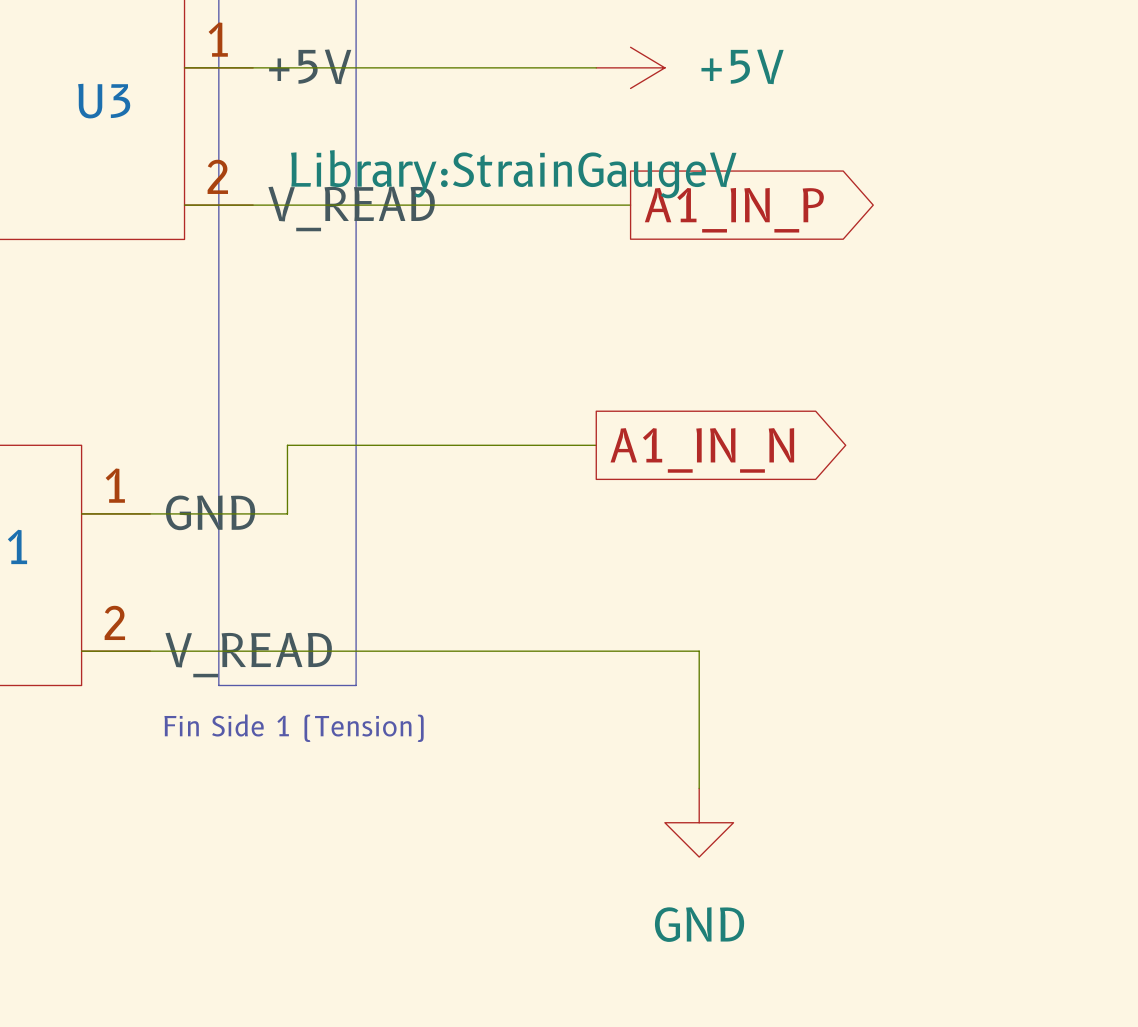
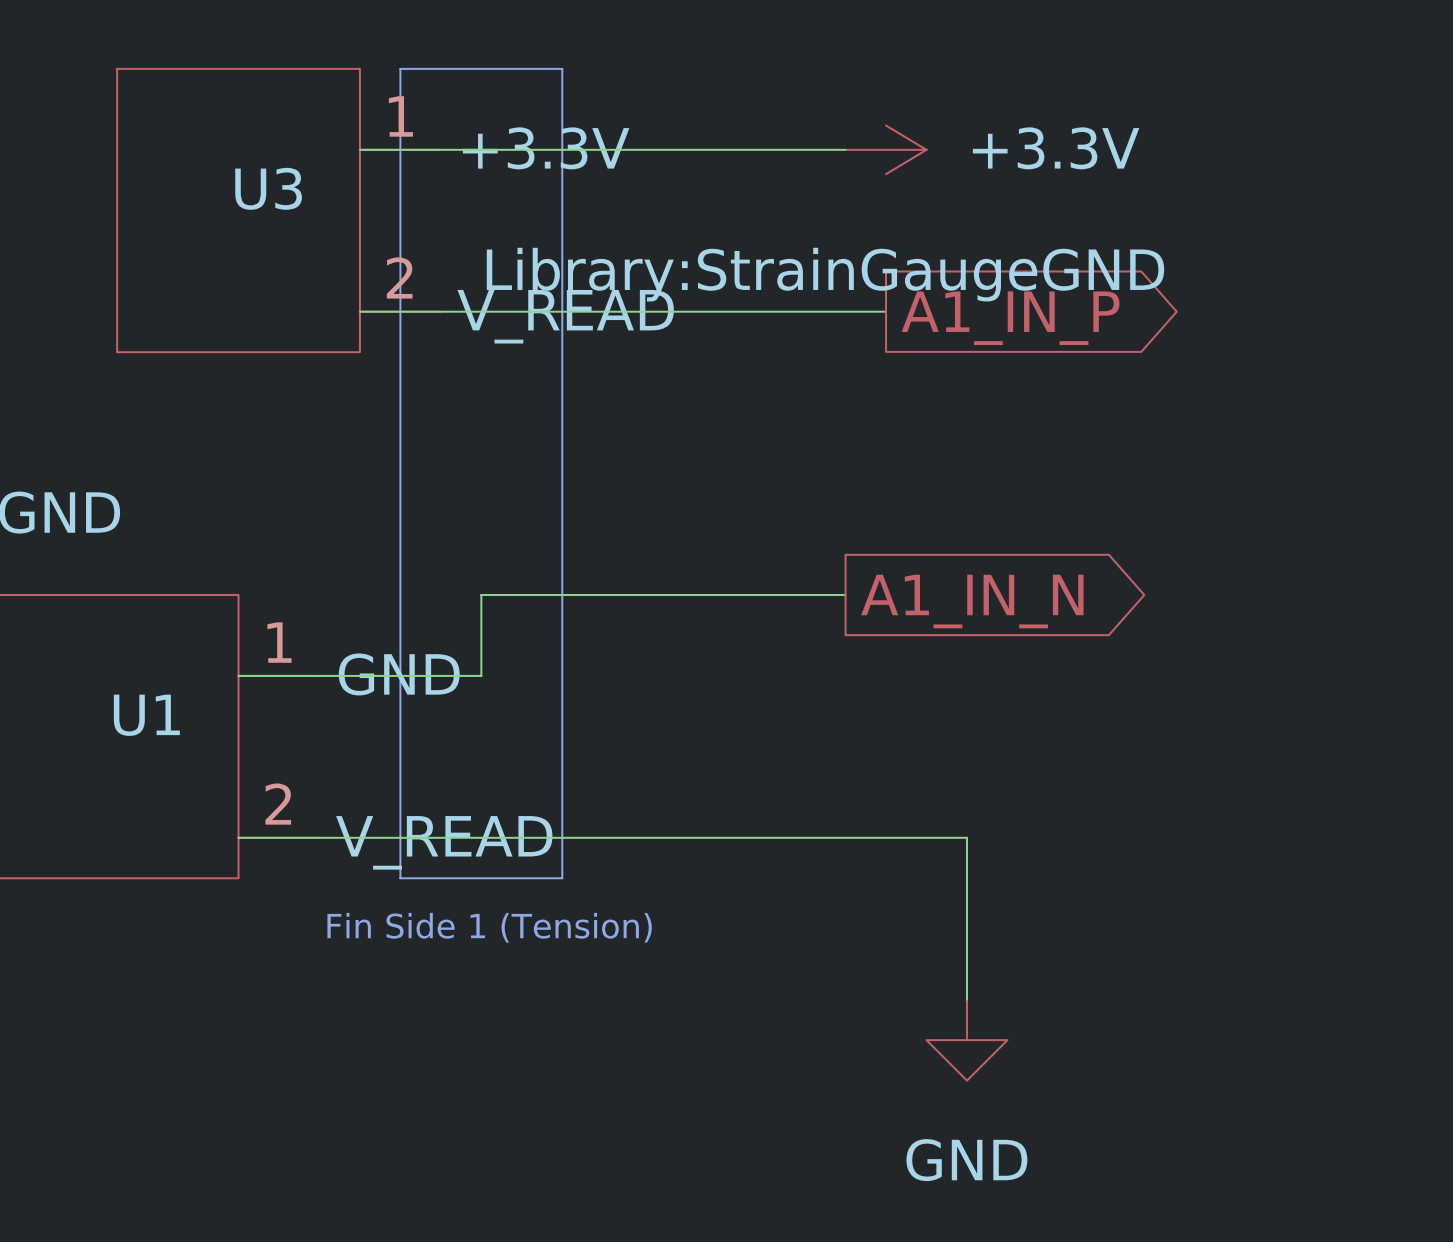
U3 pin name: +5V (310, 66) -> +3.3V (546, 148)
power symbol: +5V (630, 67) -> +3.3V (886, 149)
U3 text: Library:StrainGaugeV (513, 174) -> Library:StrainGaugeGND (825, 274)

